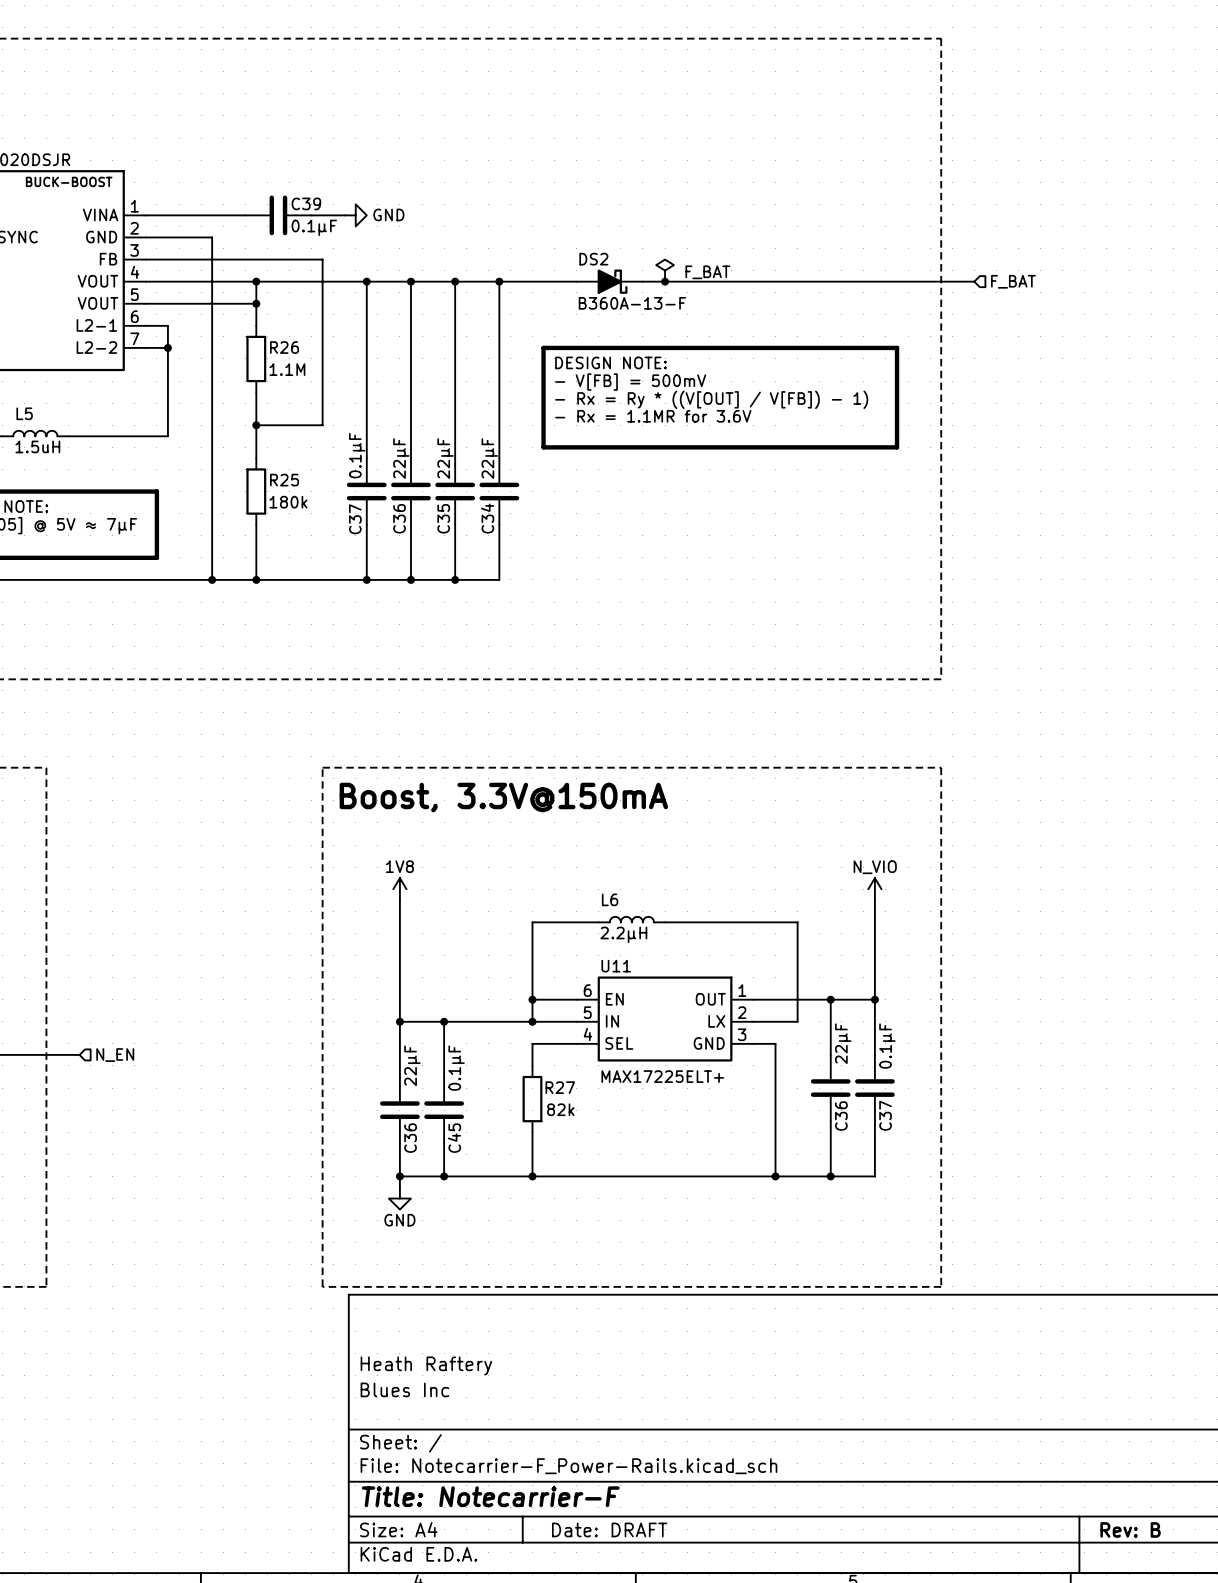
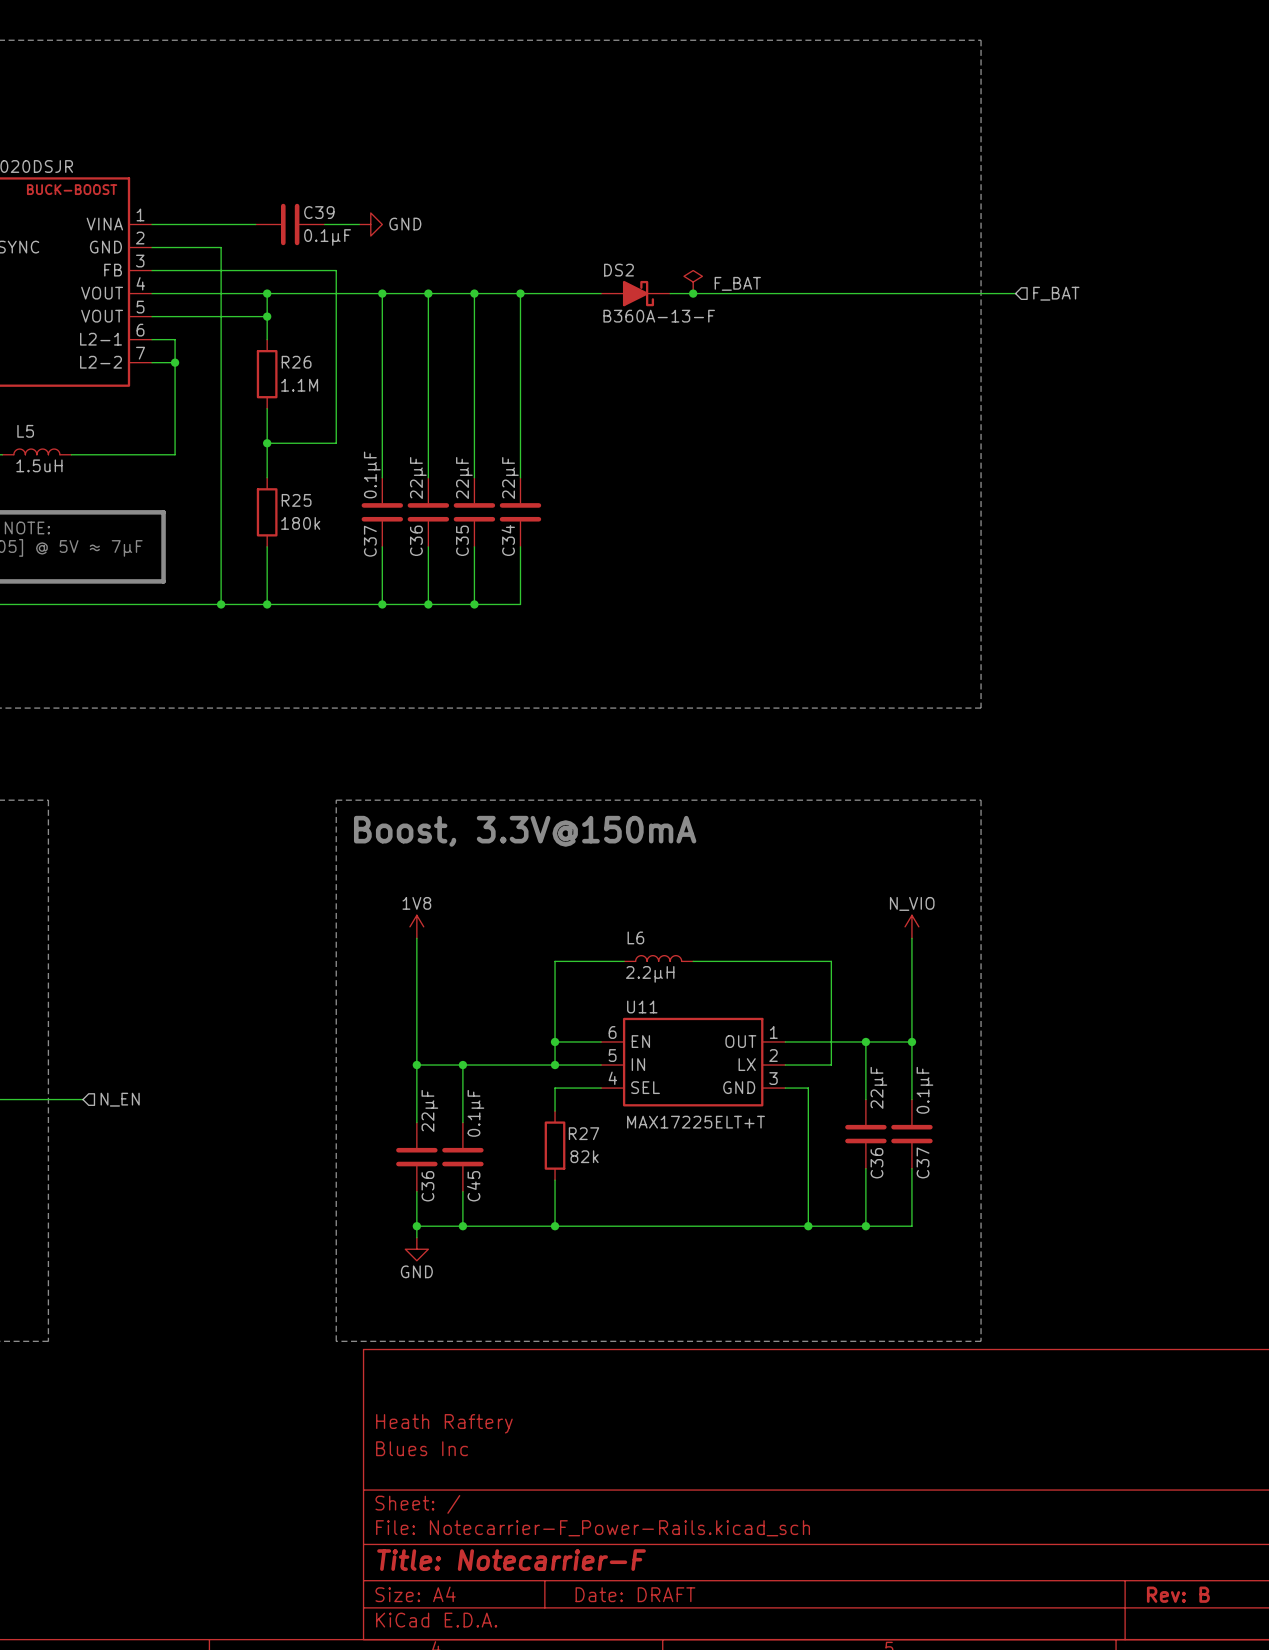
line: (543, 347) (897, 347) (897, 447) (543, 447) (543, 347) -> none
text: DESIGN NOTE: (610, 362) -> none
text: - V[FB] = 500mV (630, 382) -> none
text: - Rx = Ry * ((V[OUT] / V[FB]) - 1) (711, 399) -> none
text: - Rx = 1.1MR for 3.6V (653, 416) -> none
U11 value: MAX17225ELT+ (662, 1076) -> MAX17225ELT+T (696, 1122)

